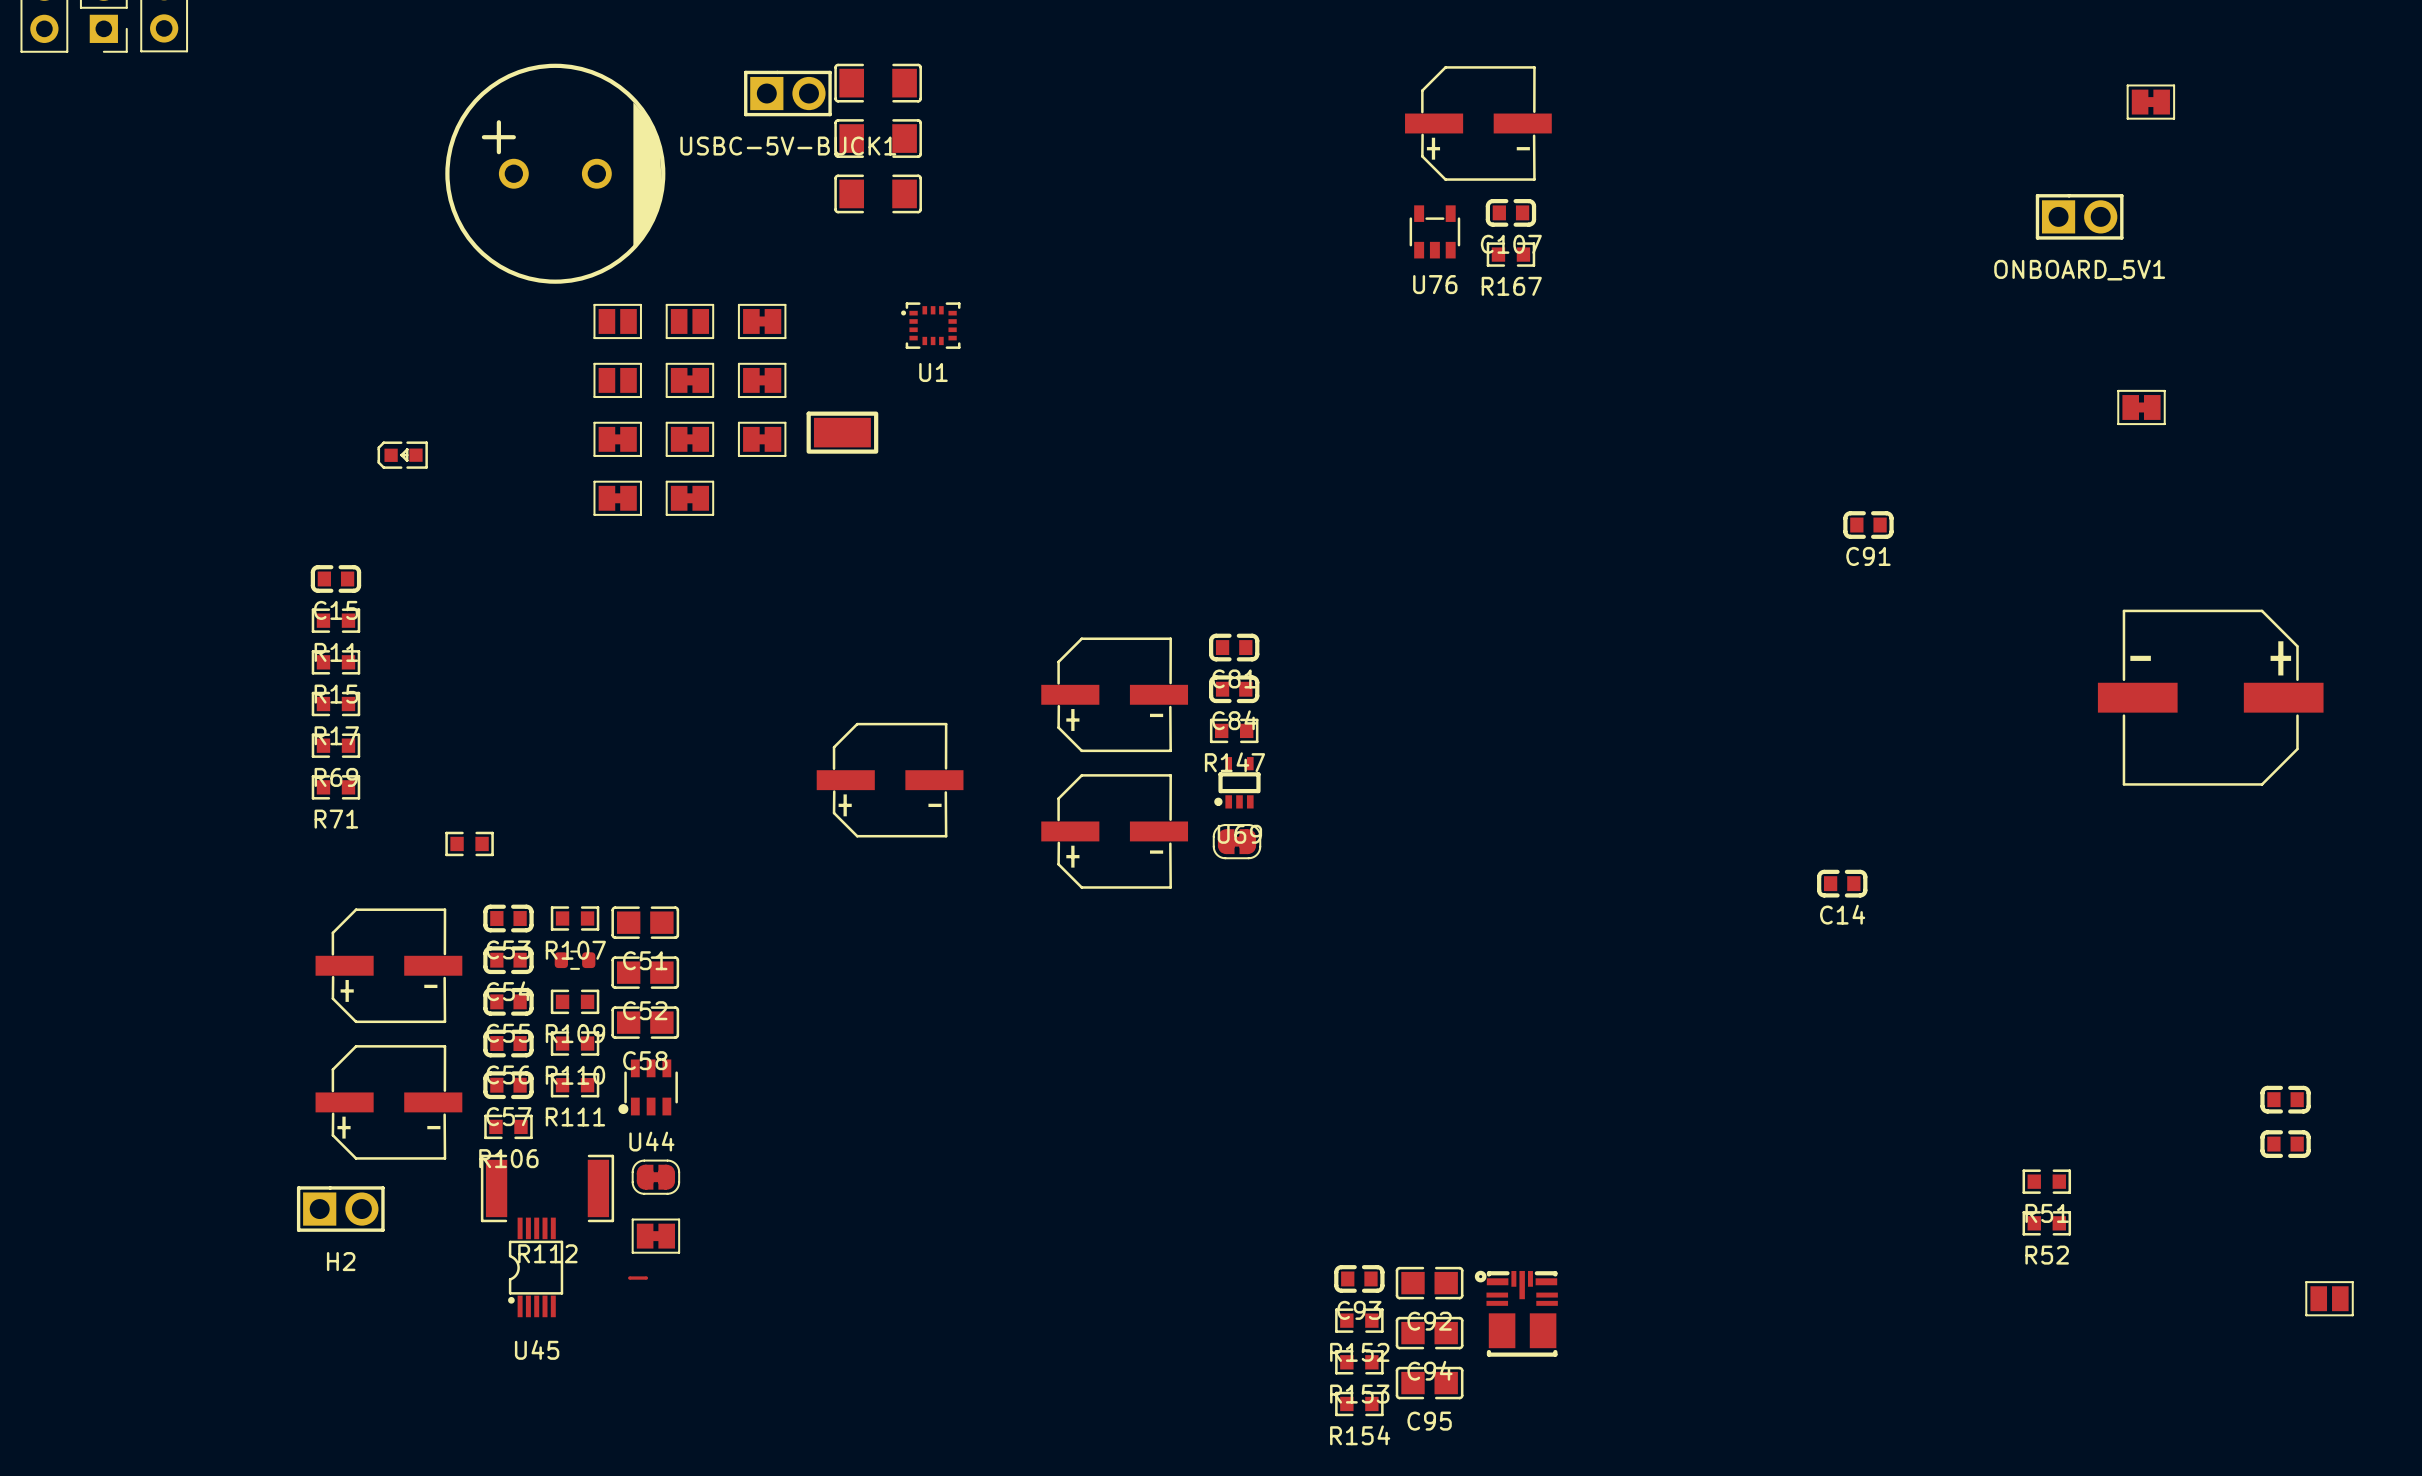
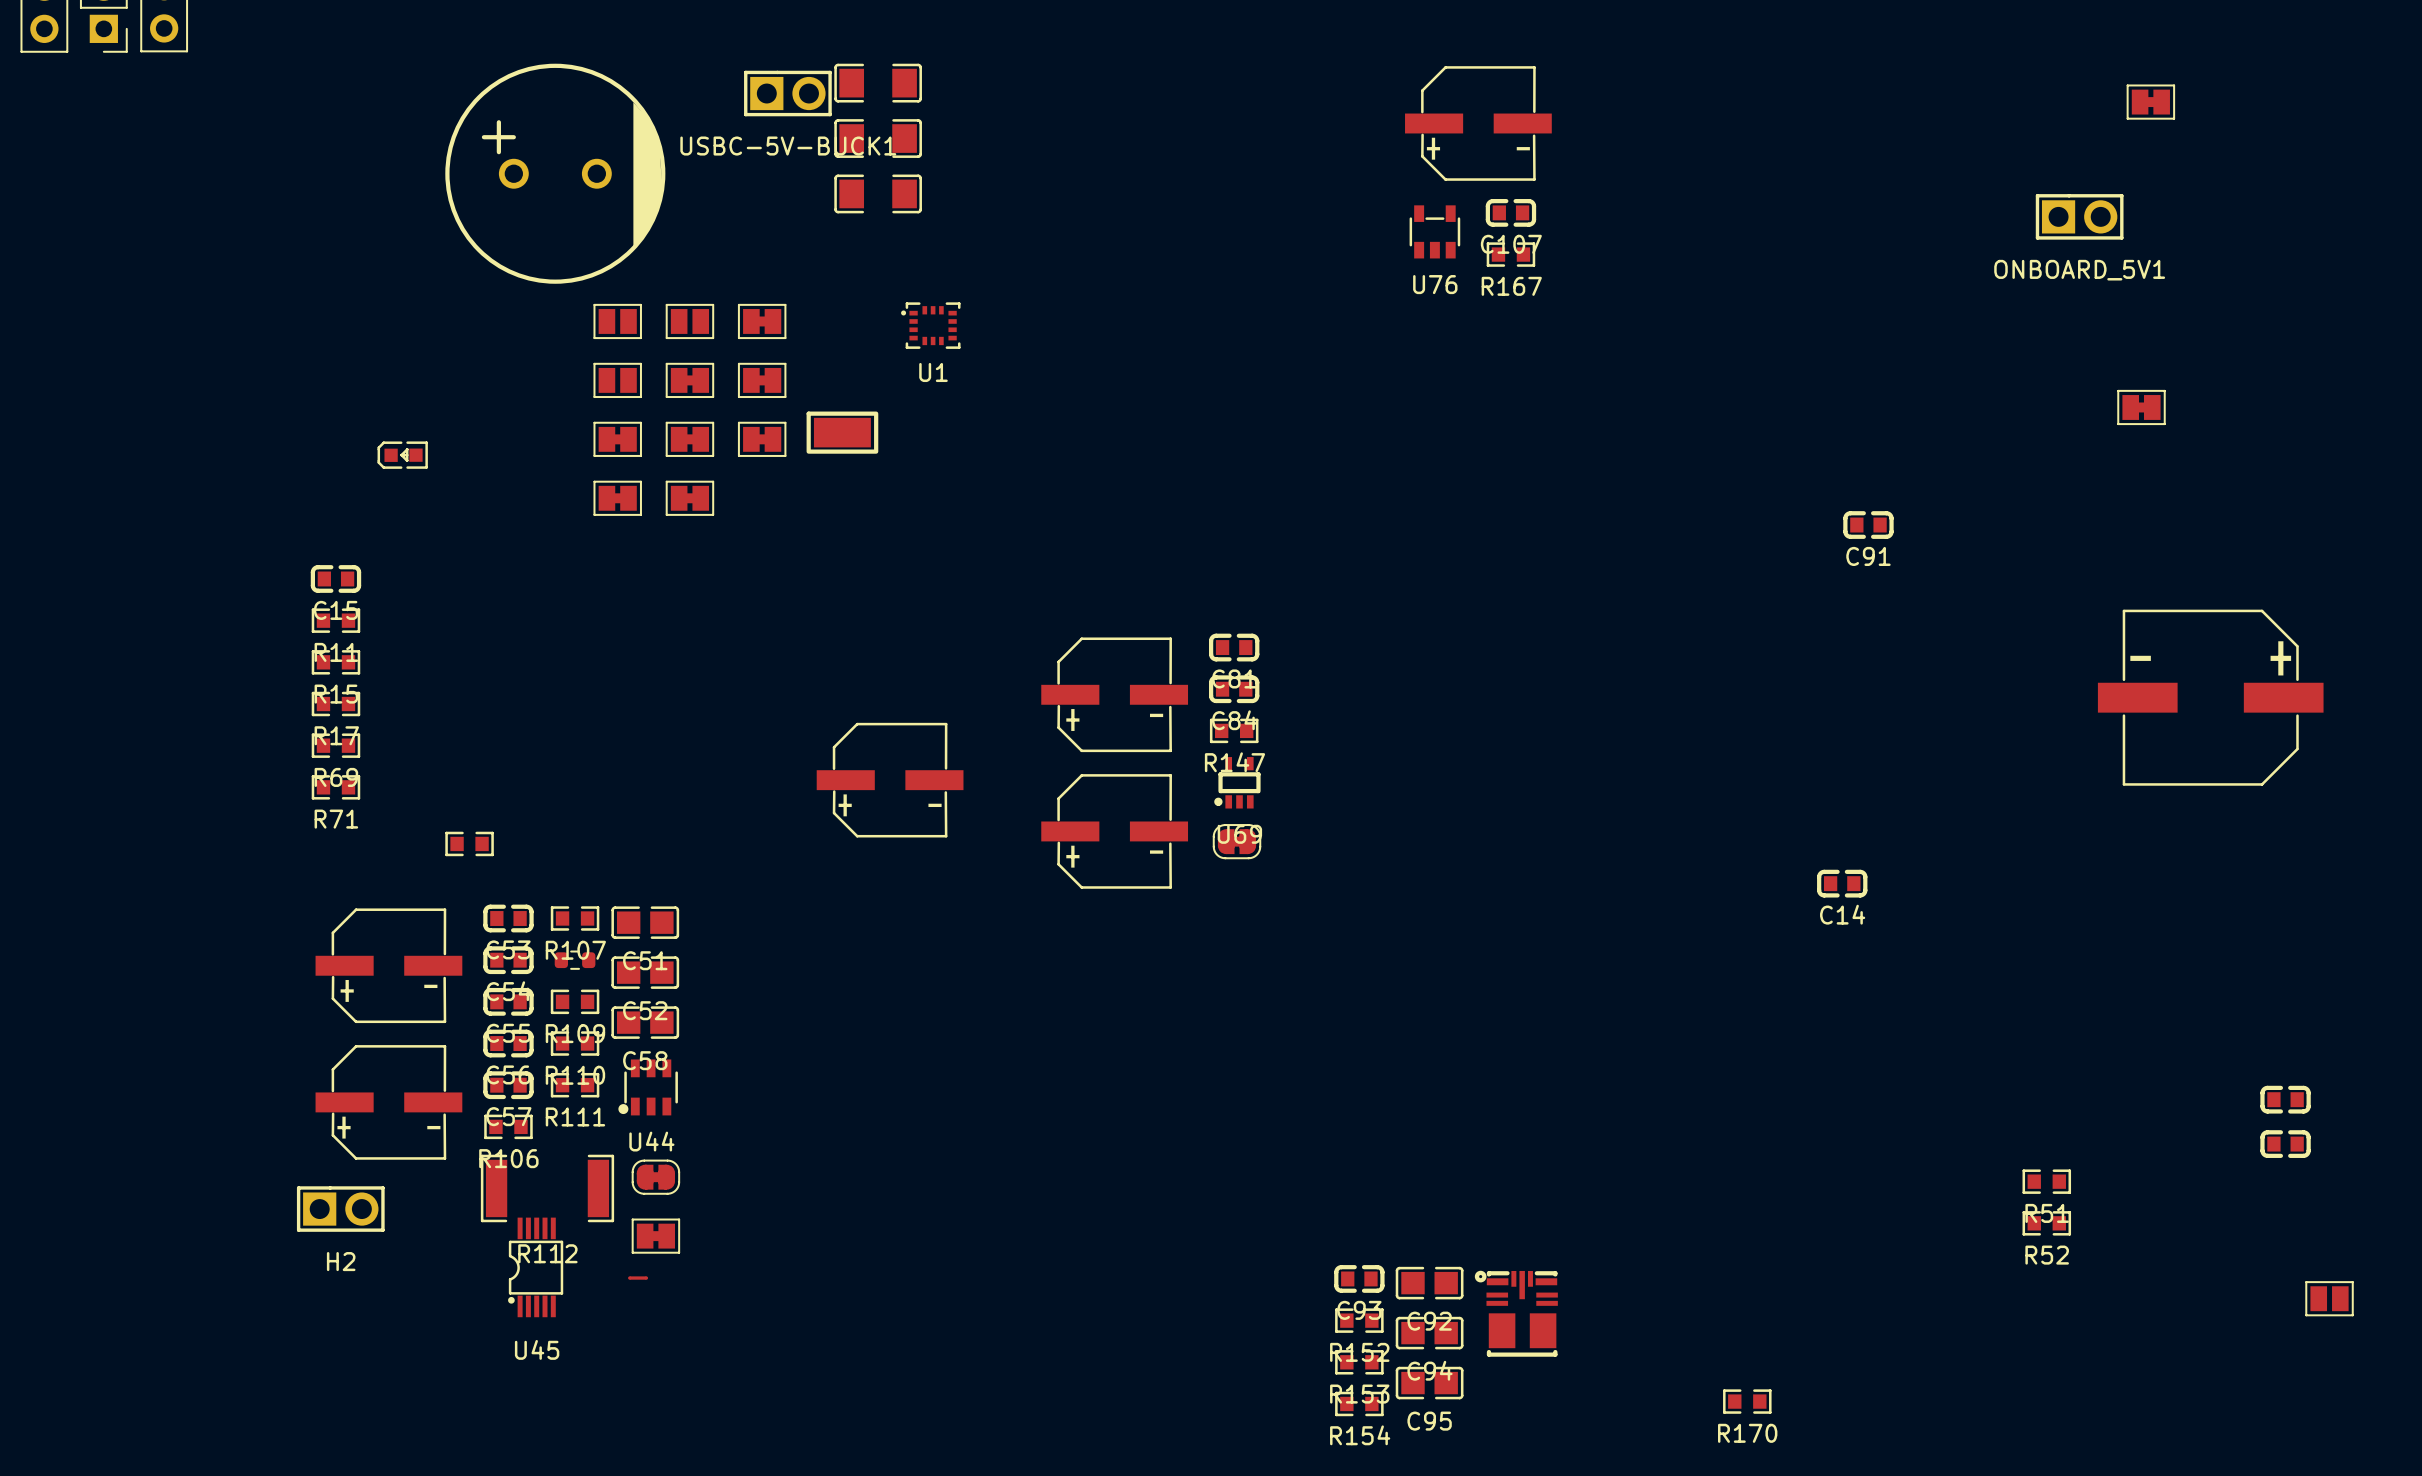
R170: none -> (1747, 1401)

